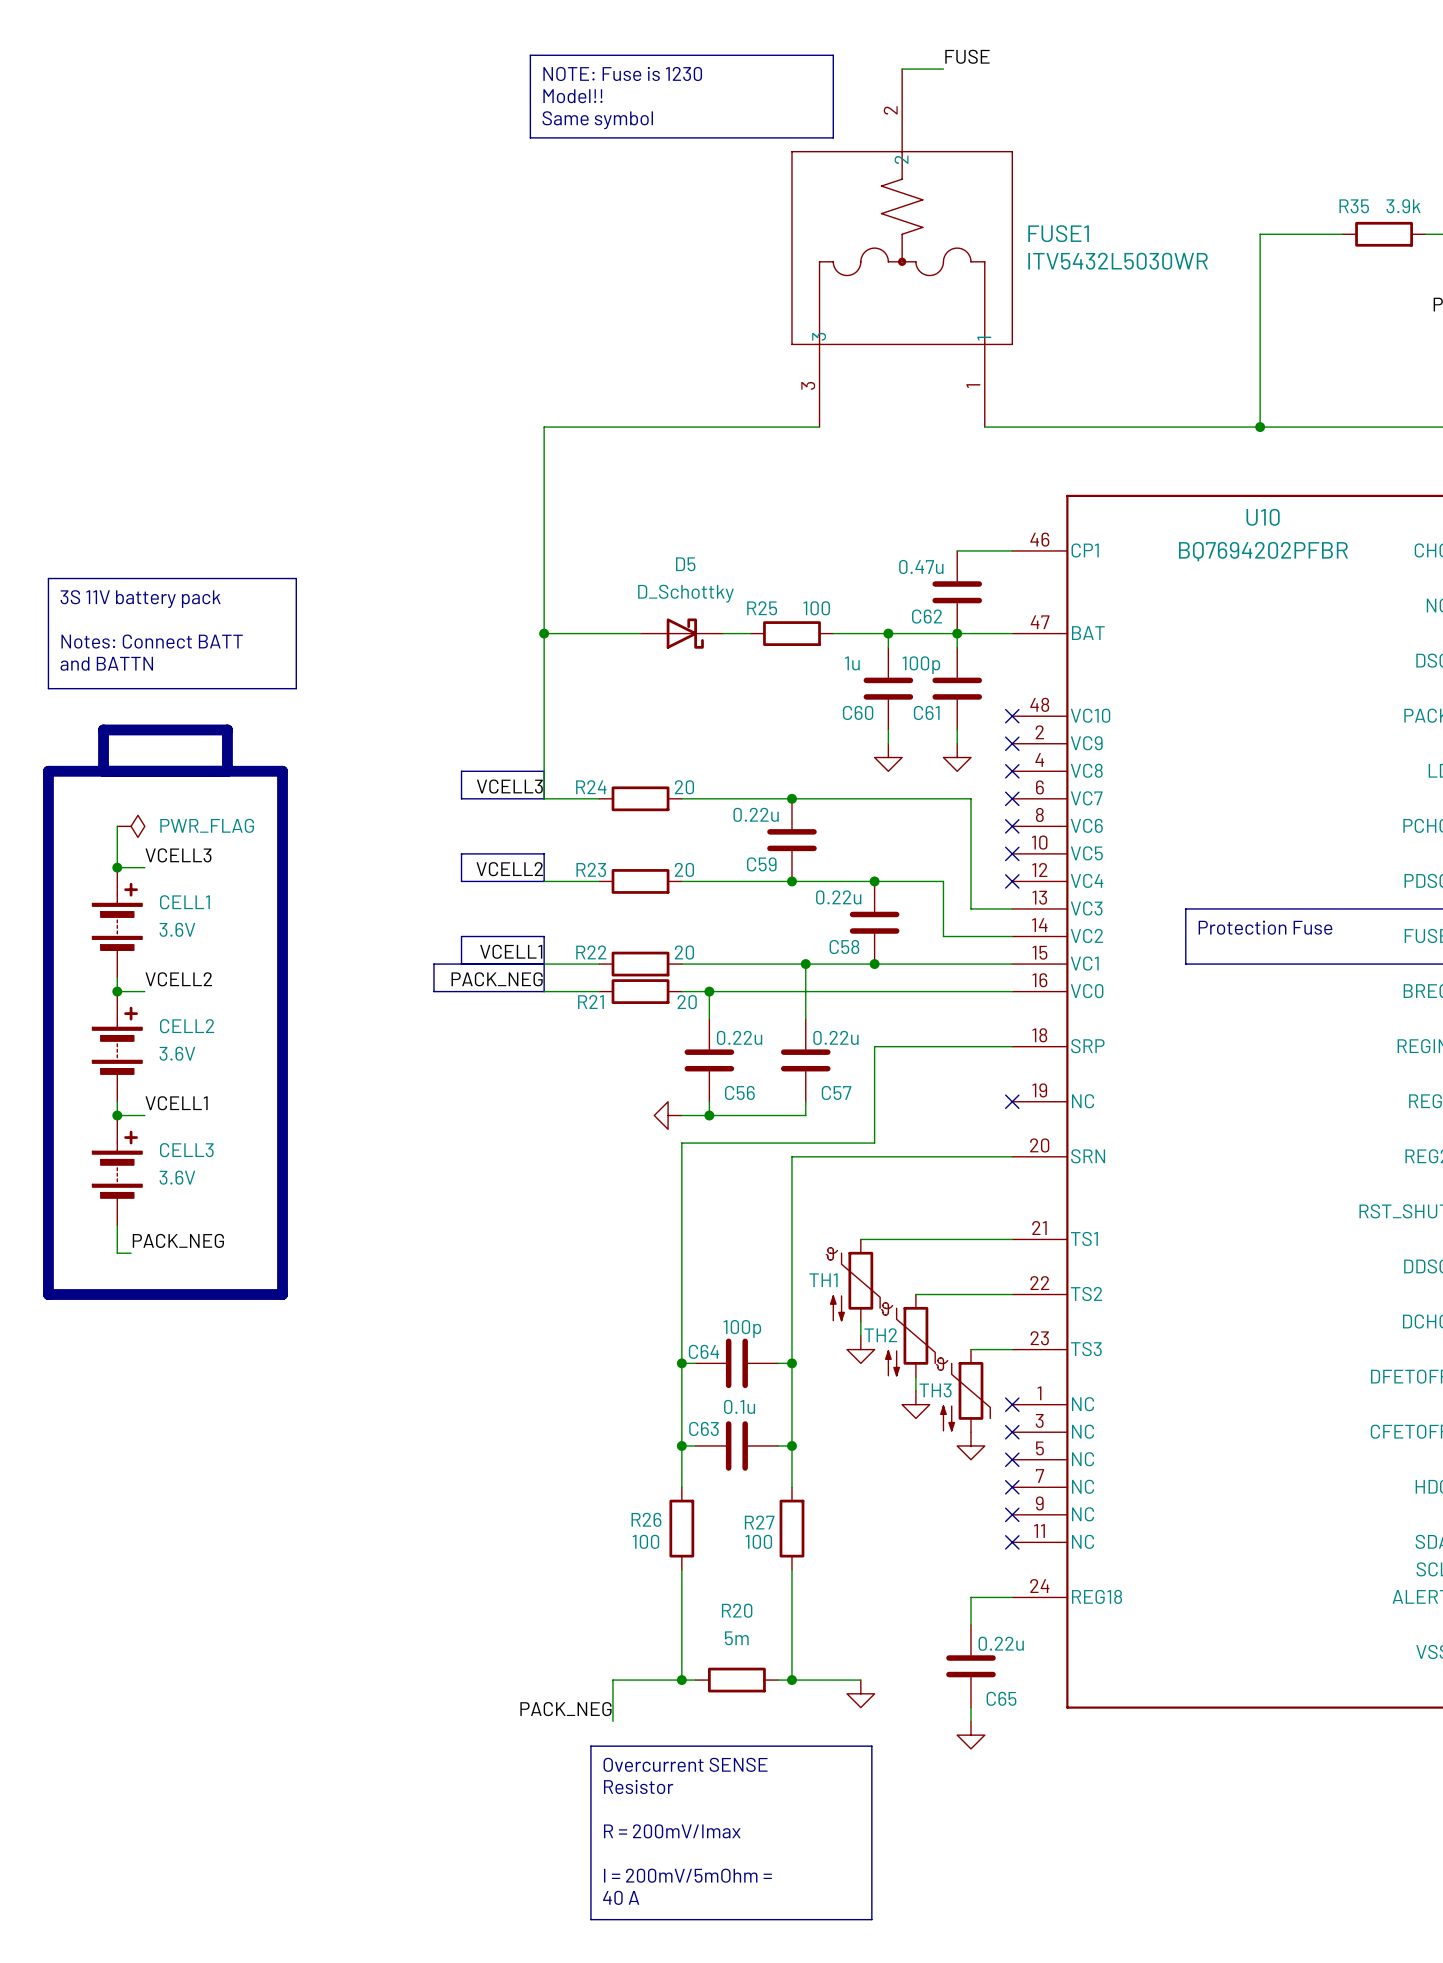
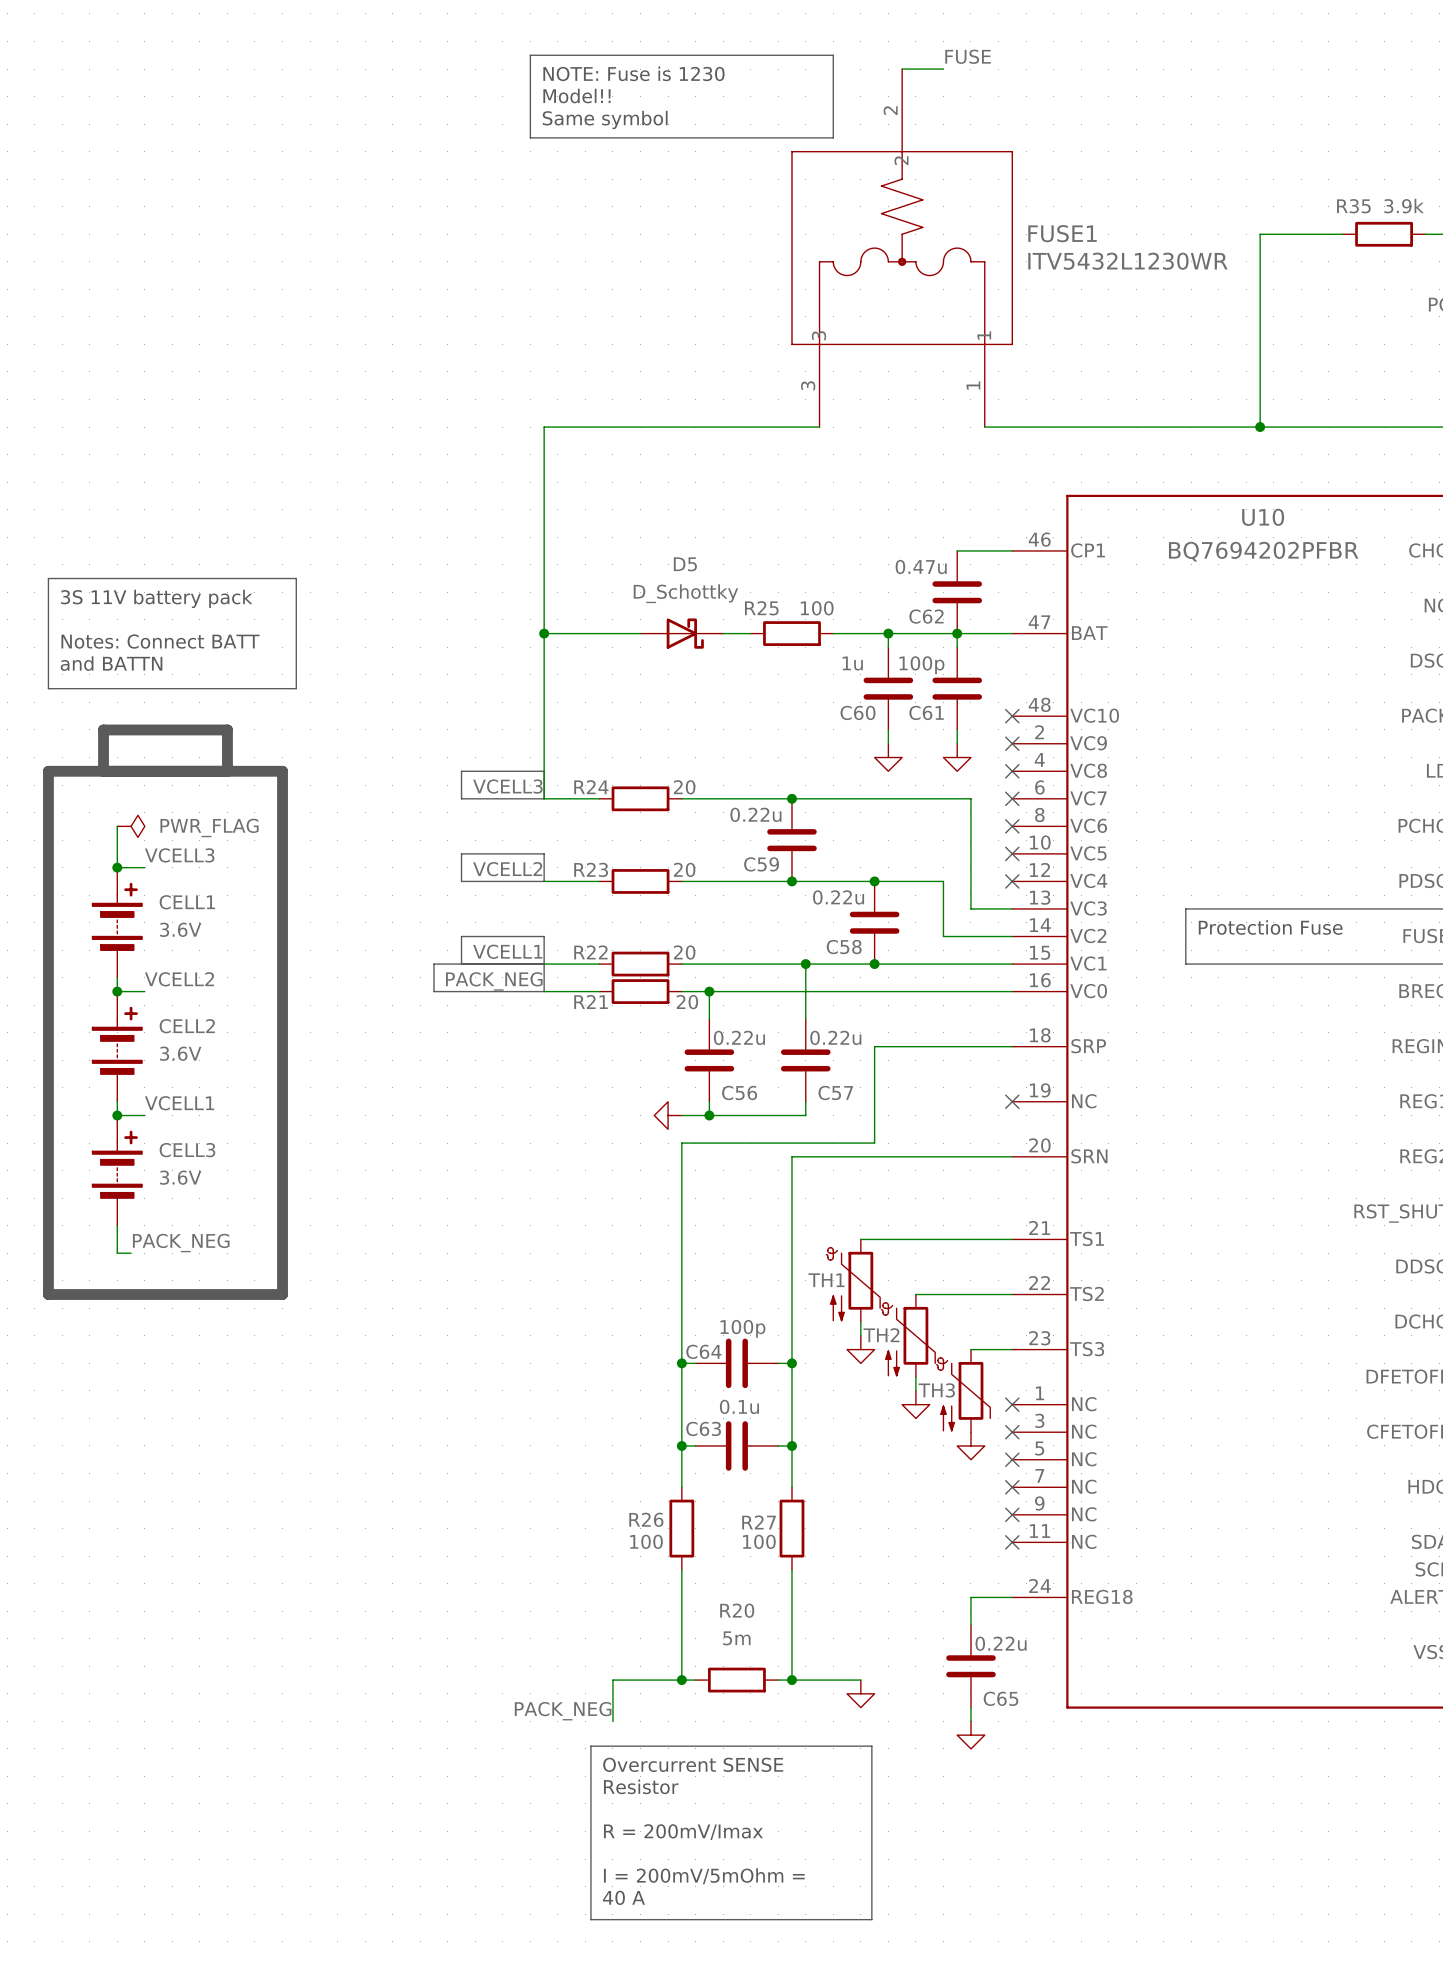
FUSE1 value: ITV5432L5030WR (1118, 261) -> ITV5432L1230WR (1127, 261)

